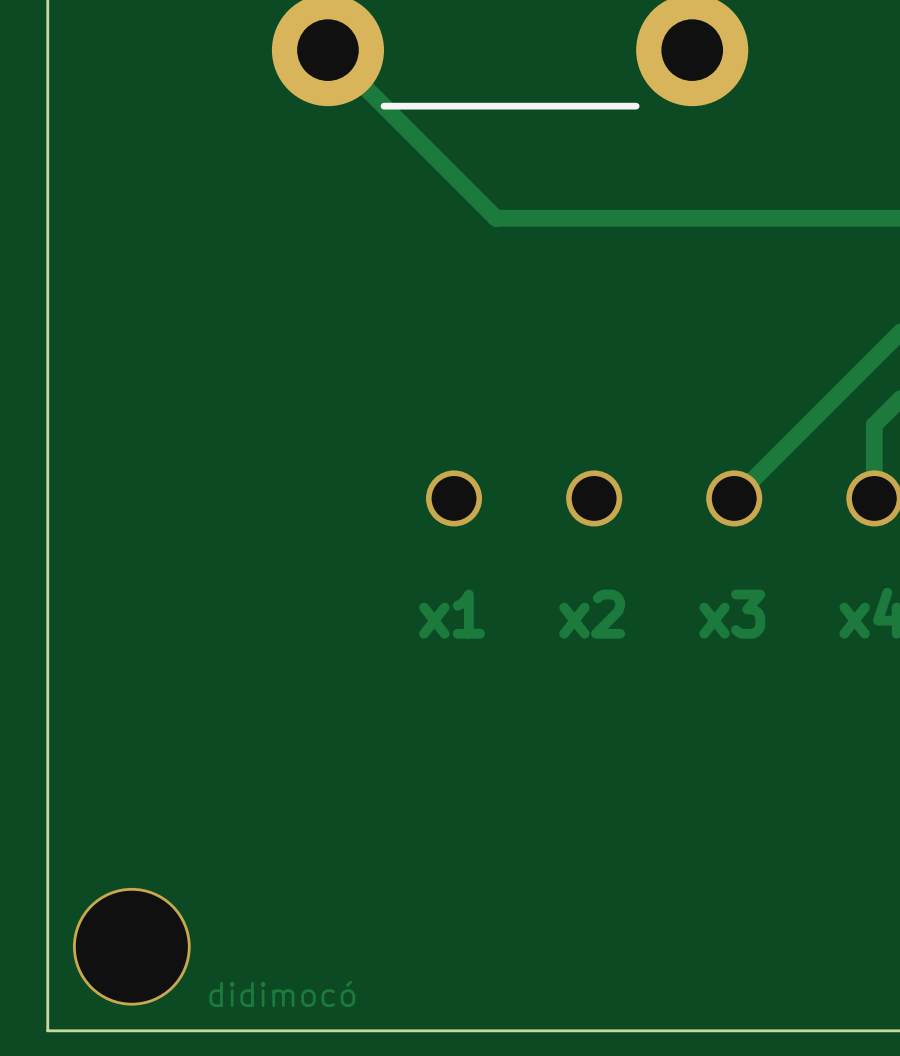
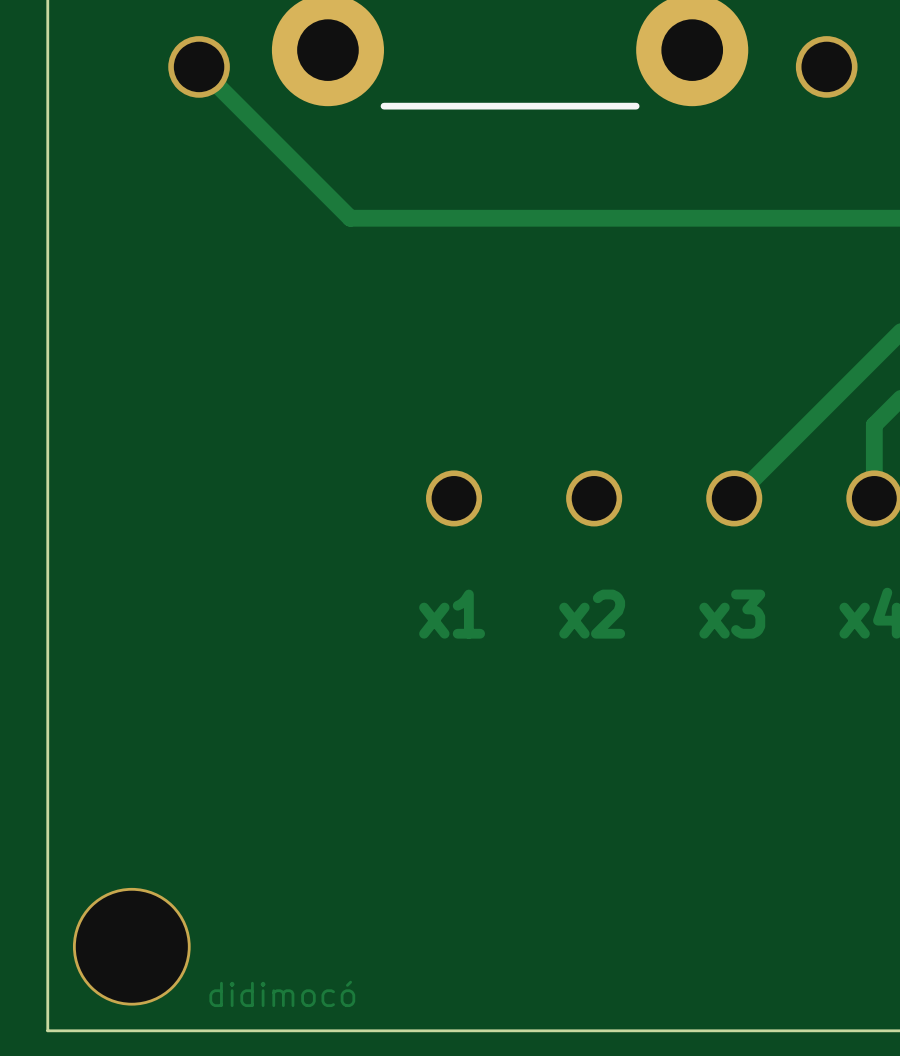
track: (327, 50) (496, 218) -> (199, 66) (350, 218) (496, 218)
via: none -> (199, 66)
via: none -> (826, 66)

